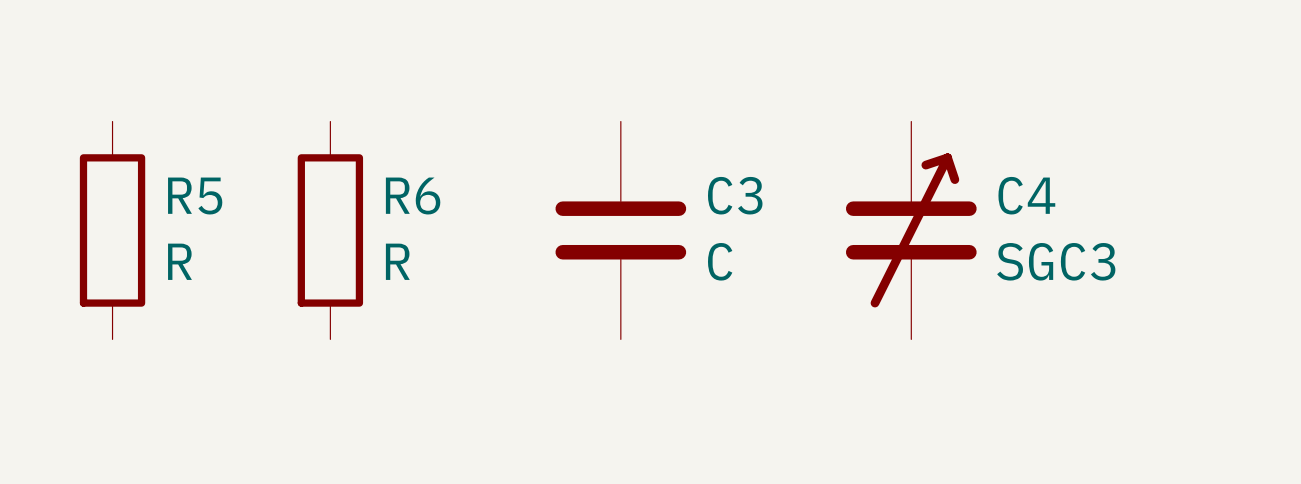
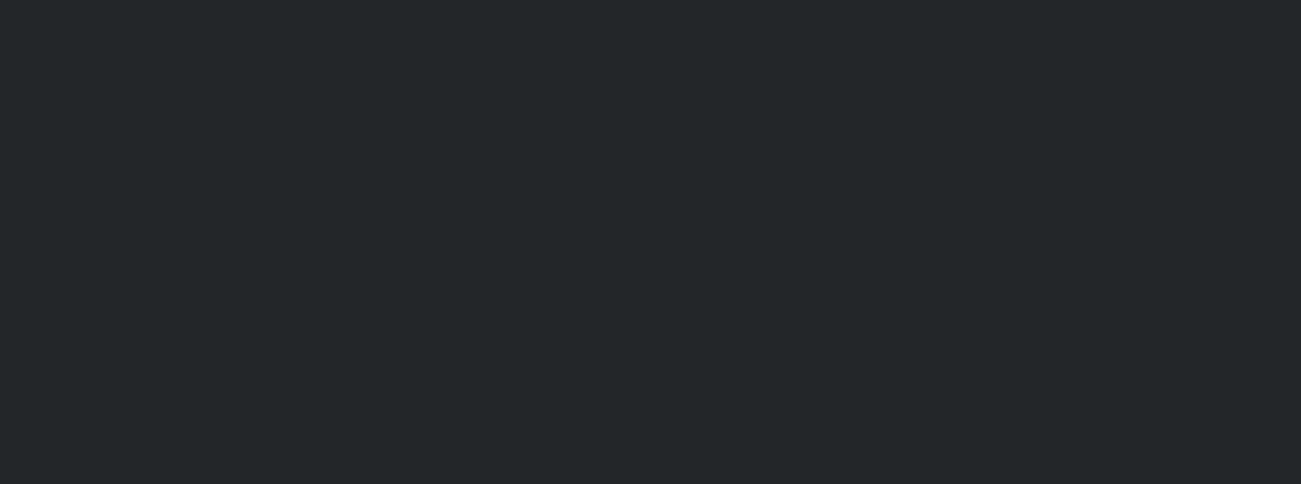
R5: R (112, 230) -> none
R6: R (330, 230) -> none
C3: C (620, 230) -> none
C4: SGC3 (911, 230) -> none

